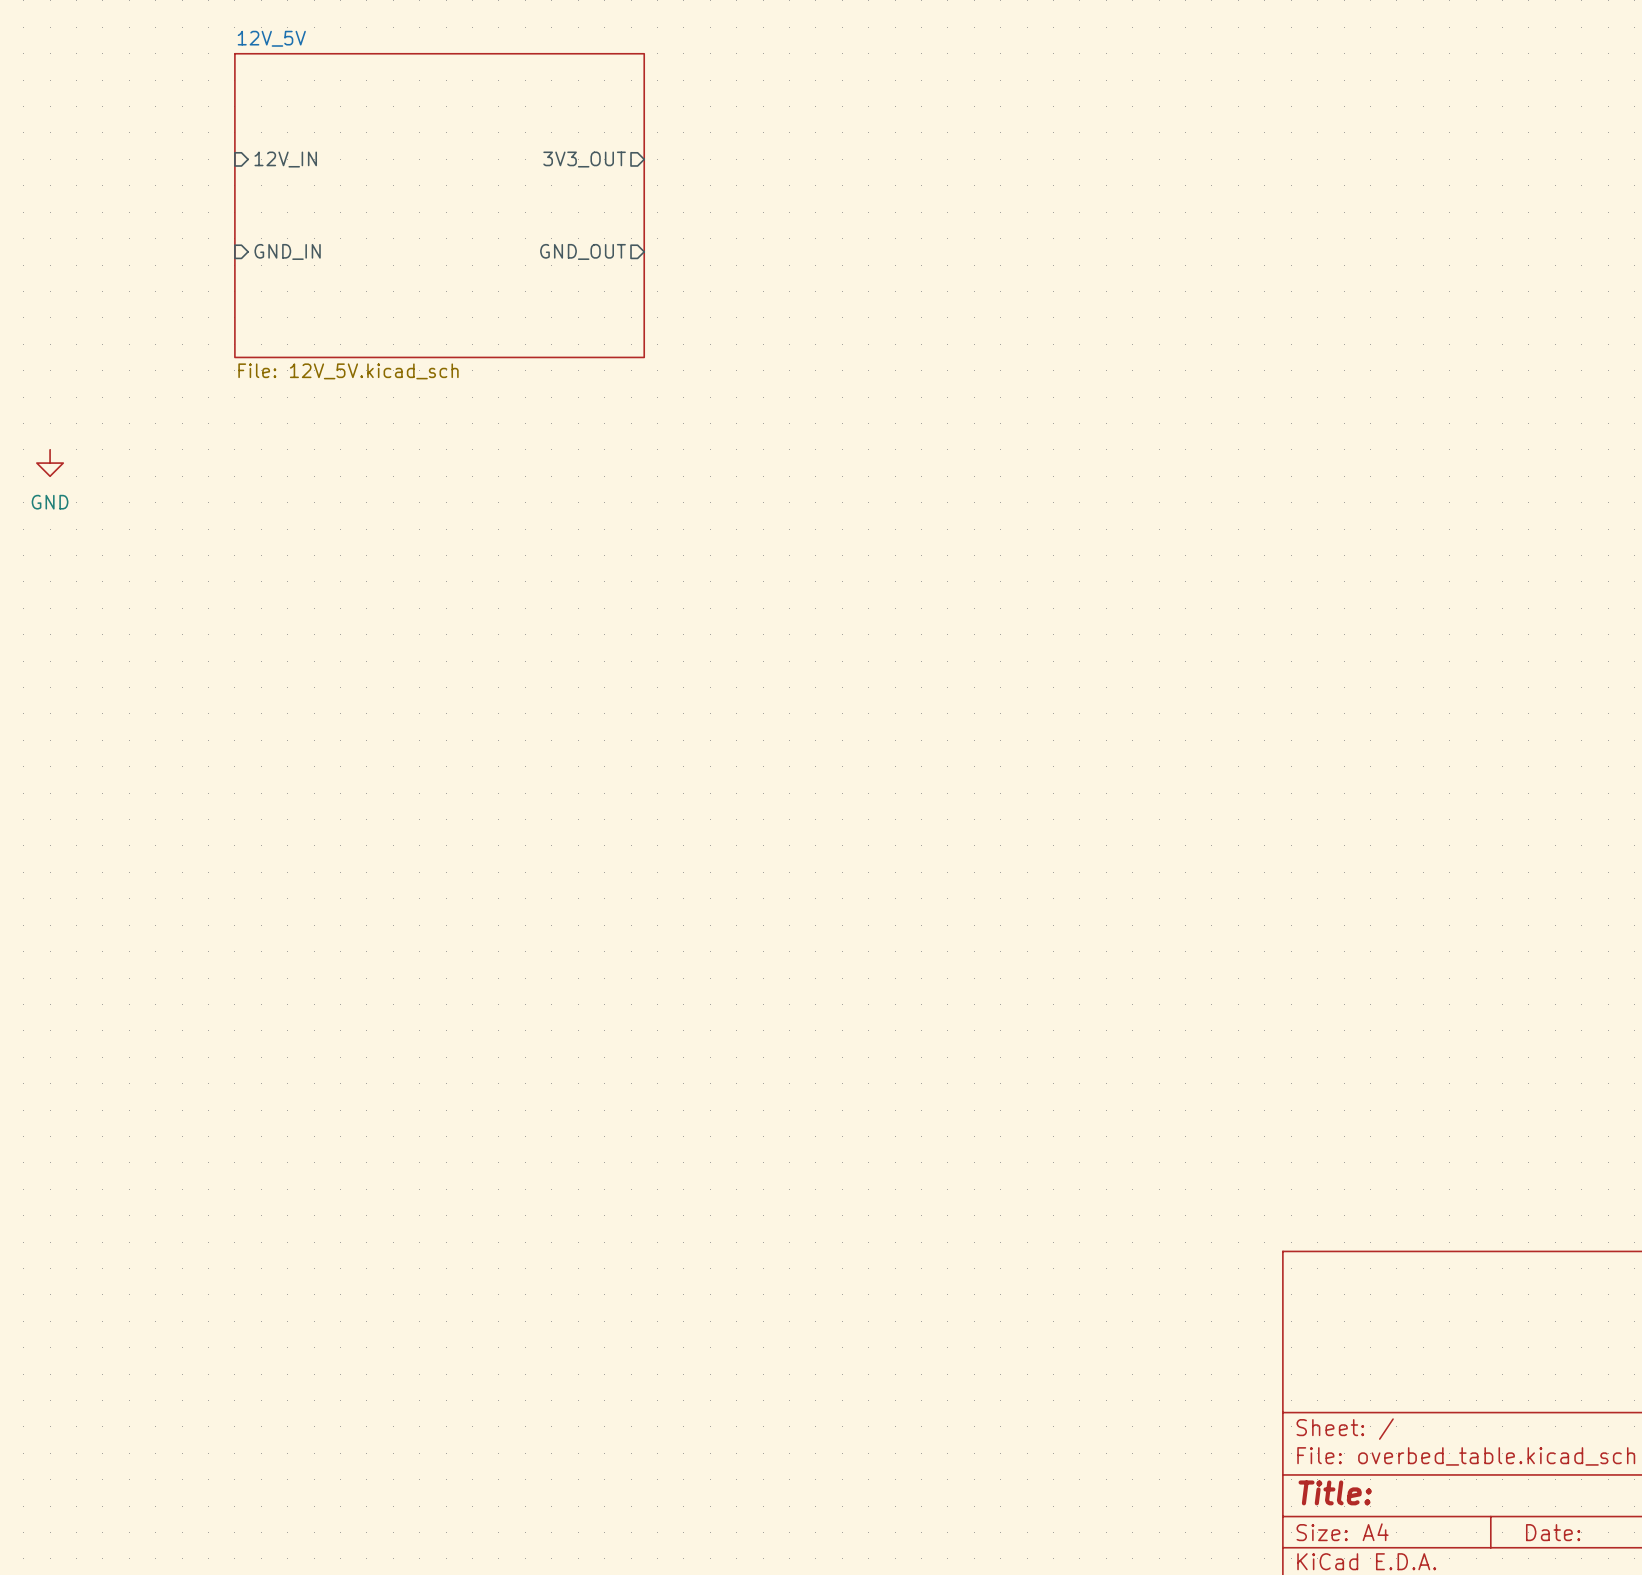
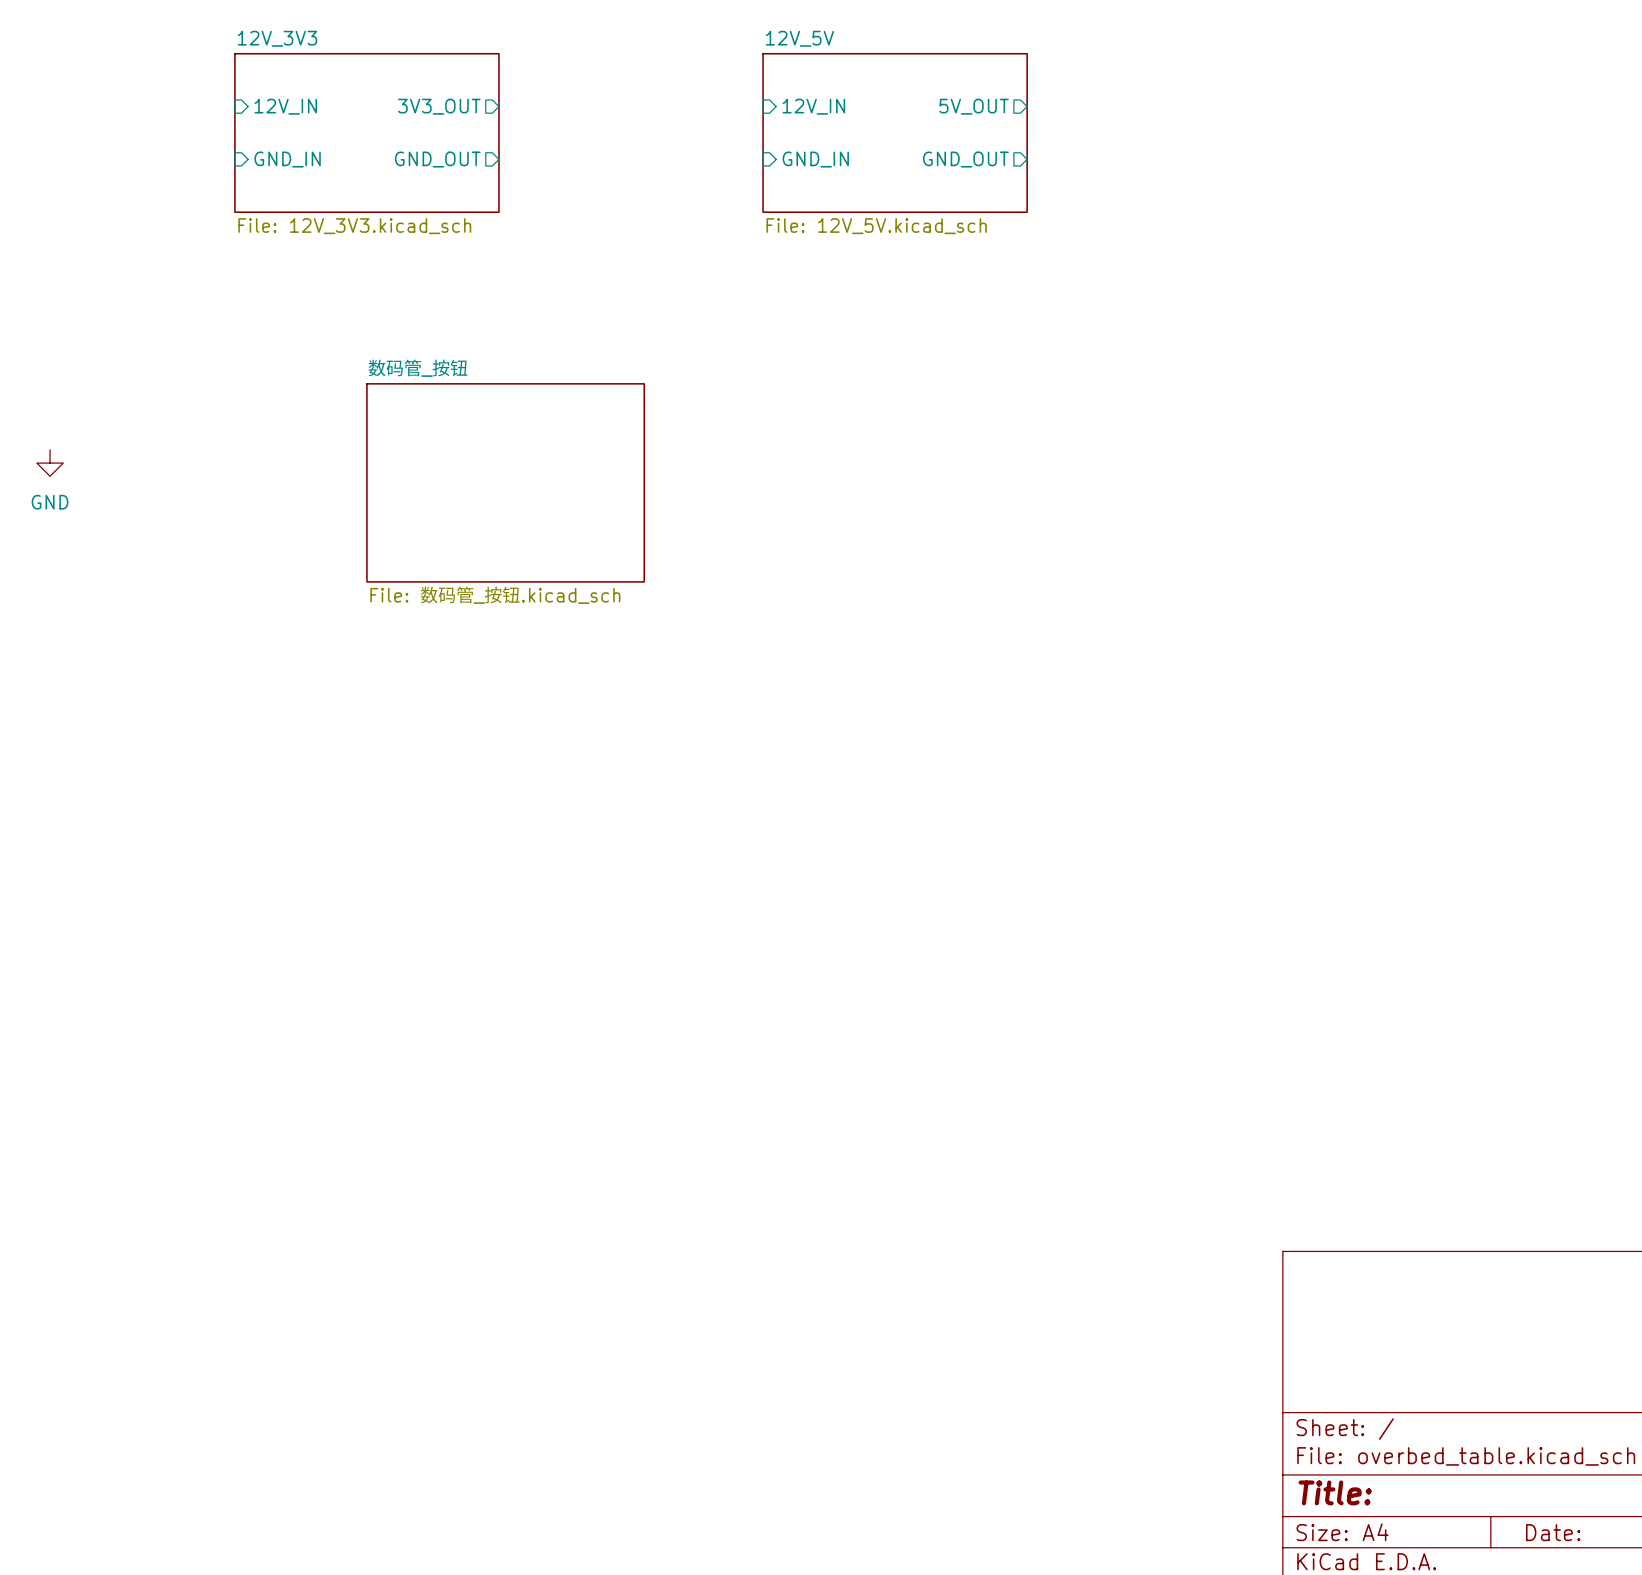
sheet 12V_5V name position: 12V_5V (271, 38) -> 12V_5V (799, 38)
sheet 12V_5V shape: [234, 52, 646, 359] -> [762, 52, 1028, 213]
sheet pin: none -> 12V_IN (285, 106)
sheet pin: none -> 12V_IN (813, 106)
sheet pin: none -> 5V_OUT (974, 106)
sheet 12V_3V3: none -> File: 12V_3V3.kicad_sch (366, 132)
sheet pin: 12V_IN (285, 159) -> GND_IN (287, 159)
sheet pin position: 3V3_OUT (584, 159) -> 3V3_OUT (439, 106)
sheet pin: none -> GND_IN (815, 159)
sheet pin: none -> GND_OUT (965, 159)
sheet pin: GND_IN (287, 251) -> none
sheet pin position: GND_OUT (583, 251) -> GND_OUT (437, 159)
sheet 12V_5V value position: File: 12V_5V.kicad_sch (348, 371) -> File: 12V_5V.kicad_sch (876, 226)
sheet 数码管_按钮: none -> File: 数码管_按钮.kicad_sch (505, 482)

